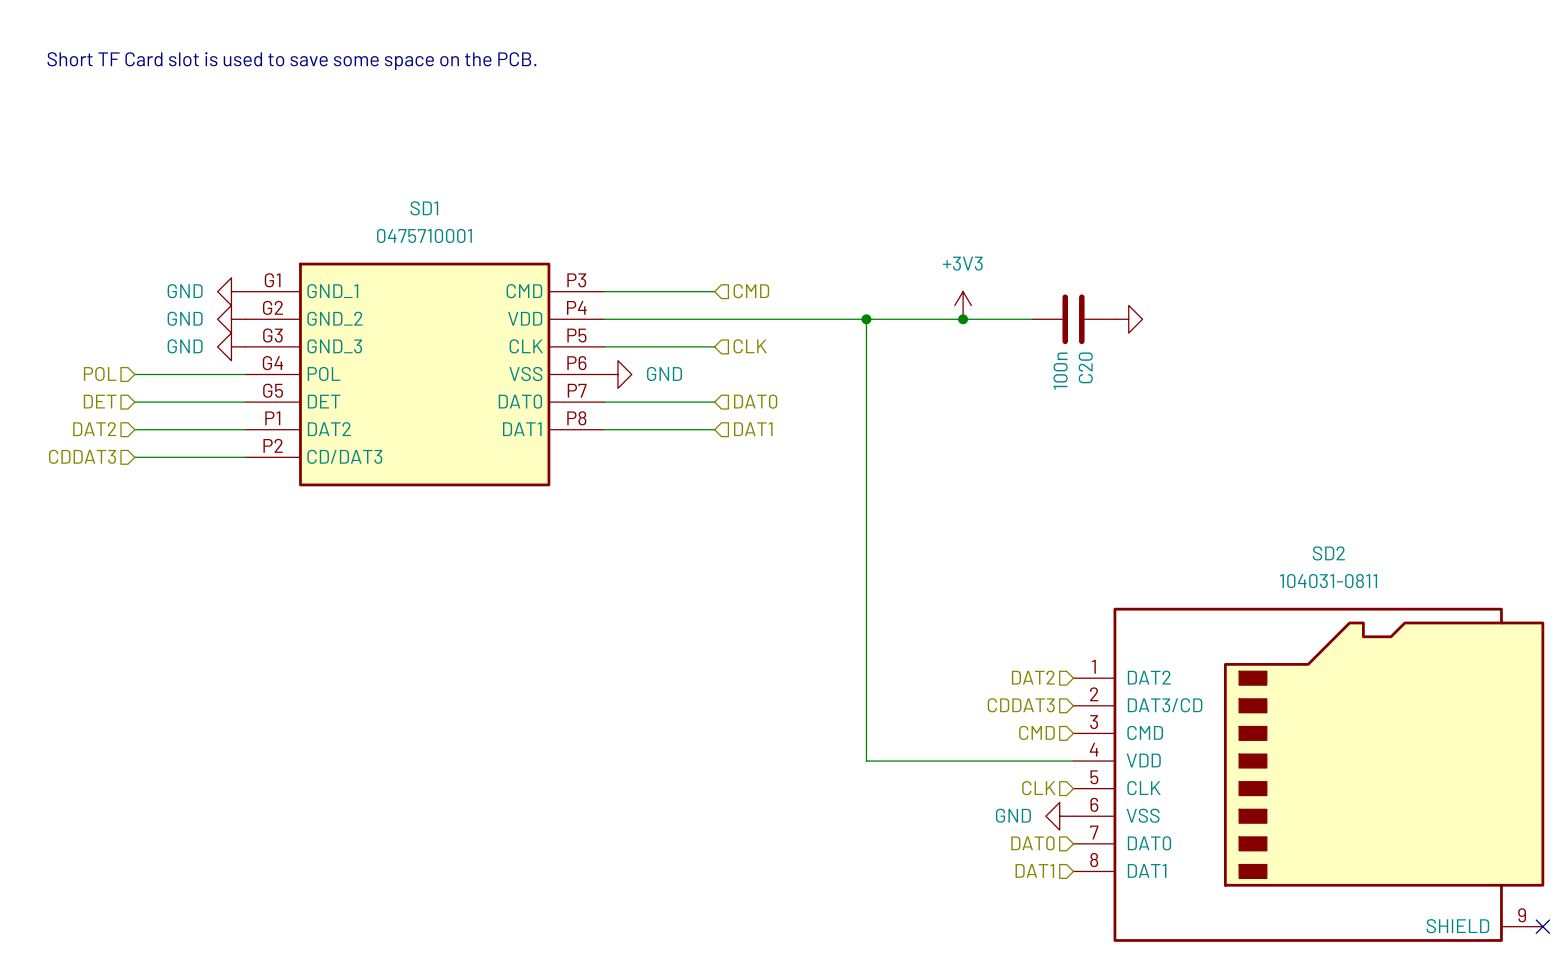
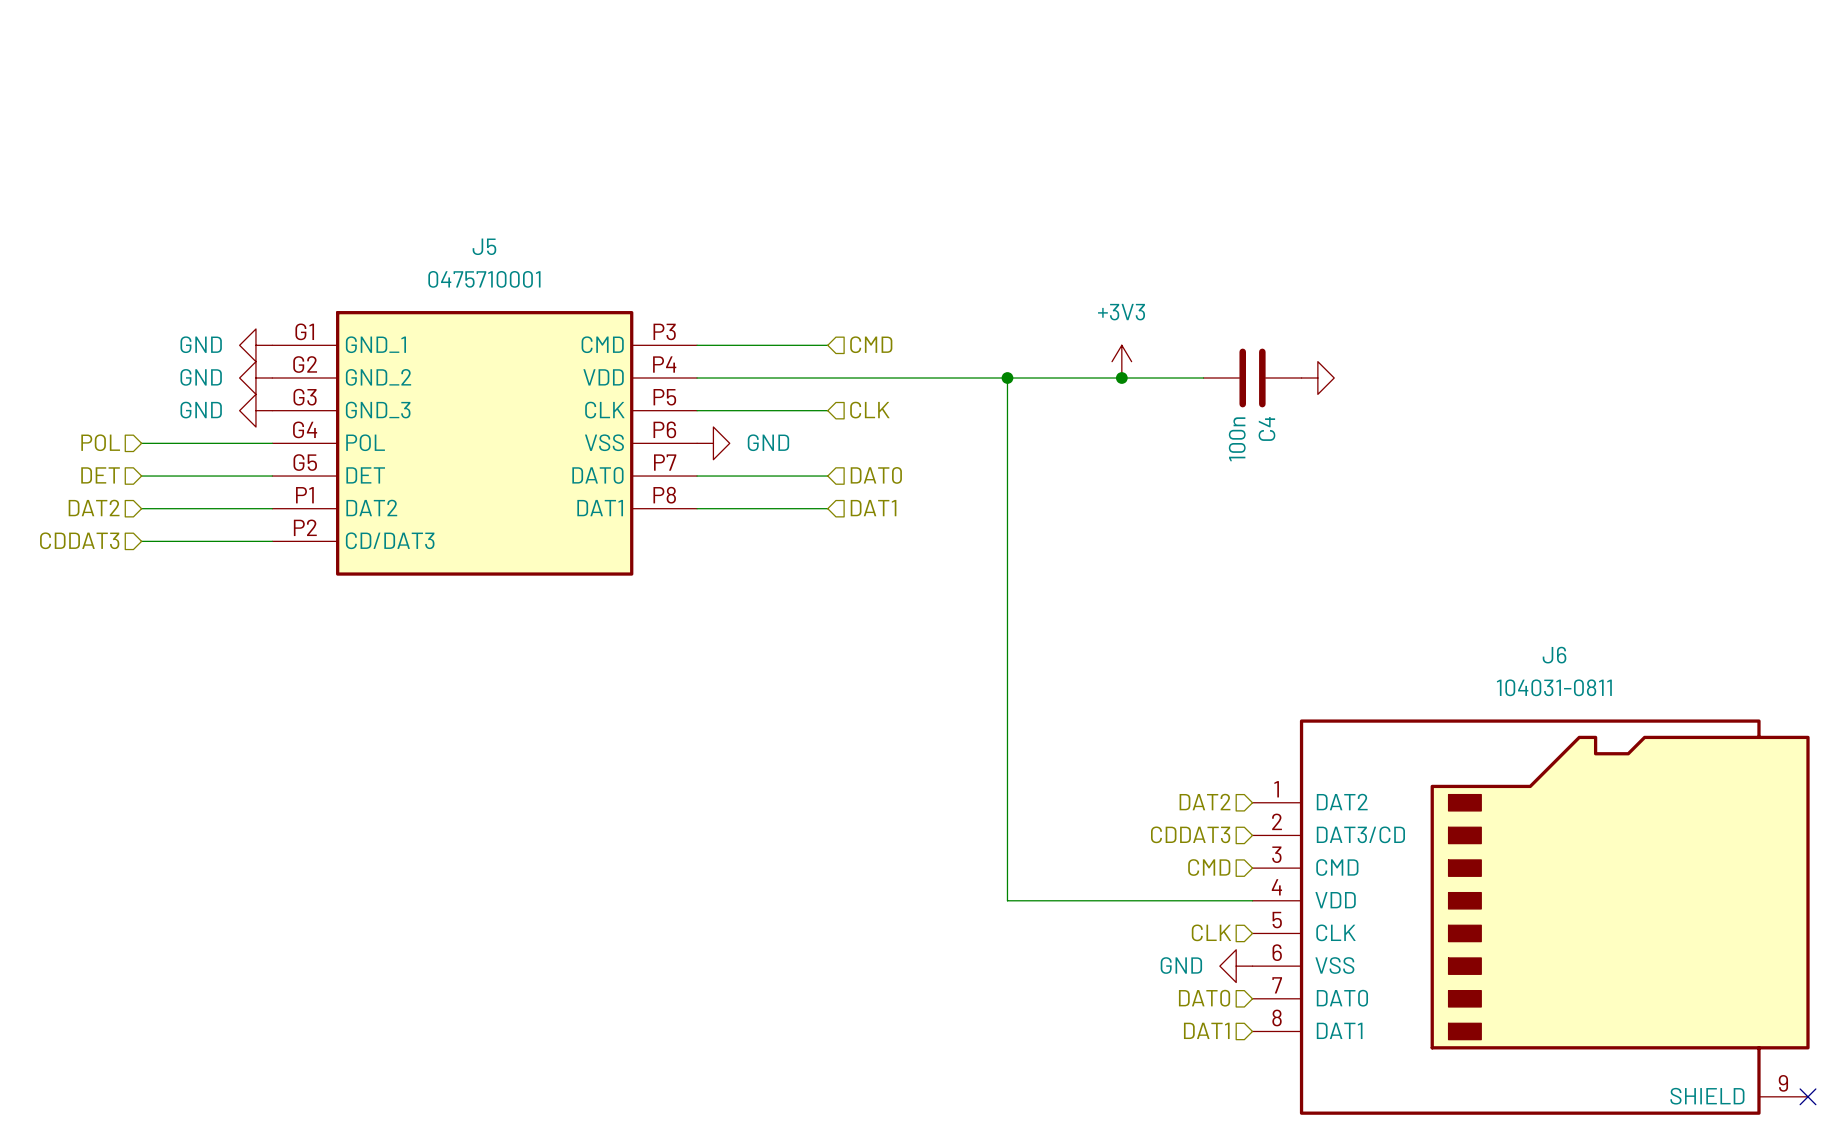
text: Short TF Card slot is used to save some space on the PCB. (291, 61) -> none
SD1 name: SD1 (424, 208) -> J5 (484, 246)
C20 name: C20 (1085, 367) -> C4 (1266, 428)
SD2 name: SD2 (1328, 553) -> J6 (1554, 655)

